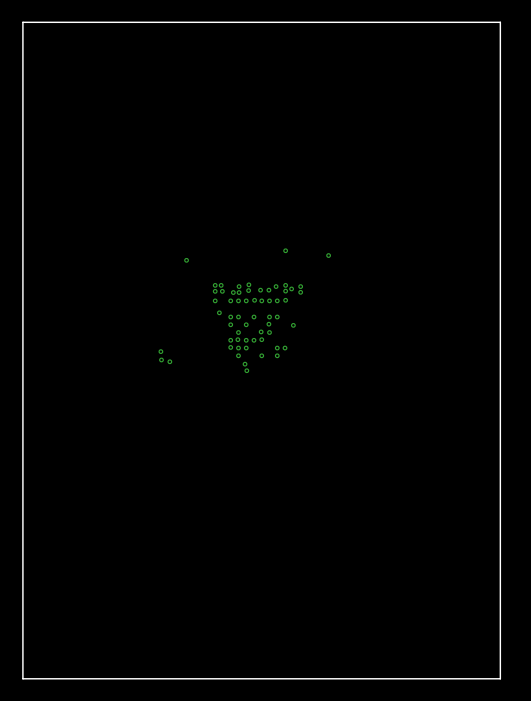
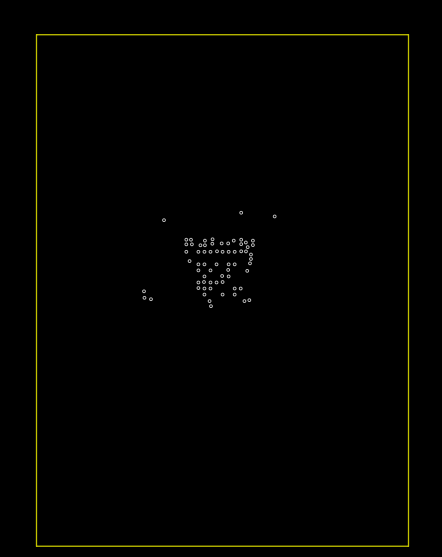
via: none -> (247, 247)
via: none -> (245, 251)
via: none -> (250, 254)
via: none -> (250, 258)
via: none -> (249, 263)
via: none -> (249, 300)
via: none -> (244, 301)

